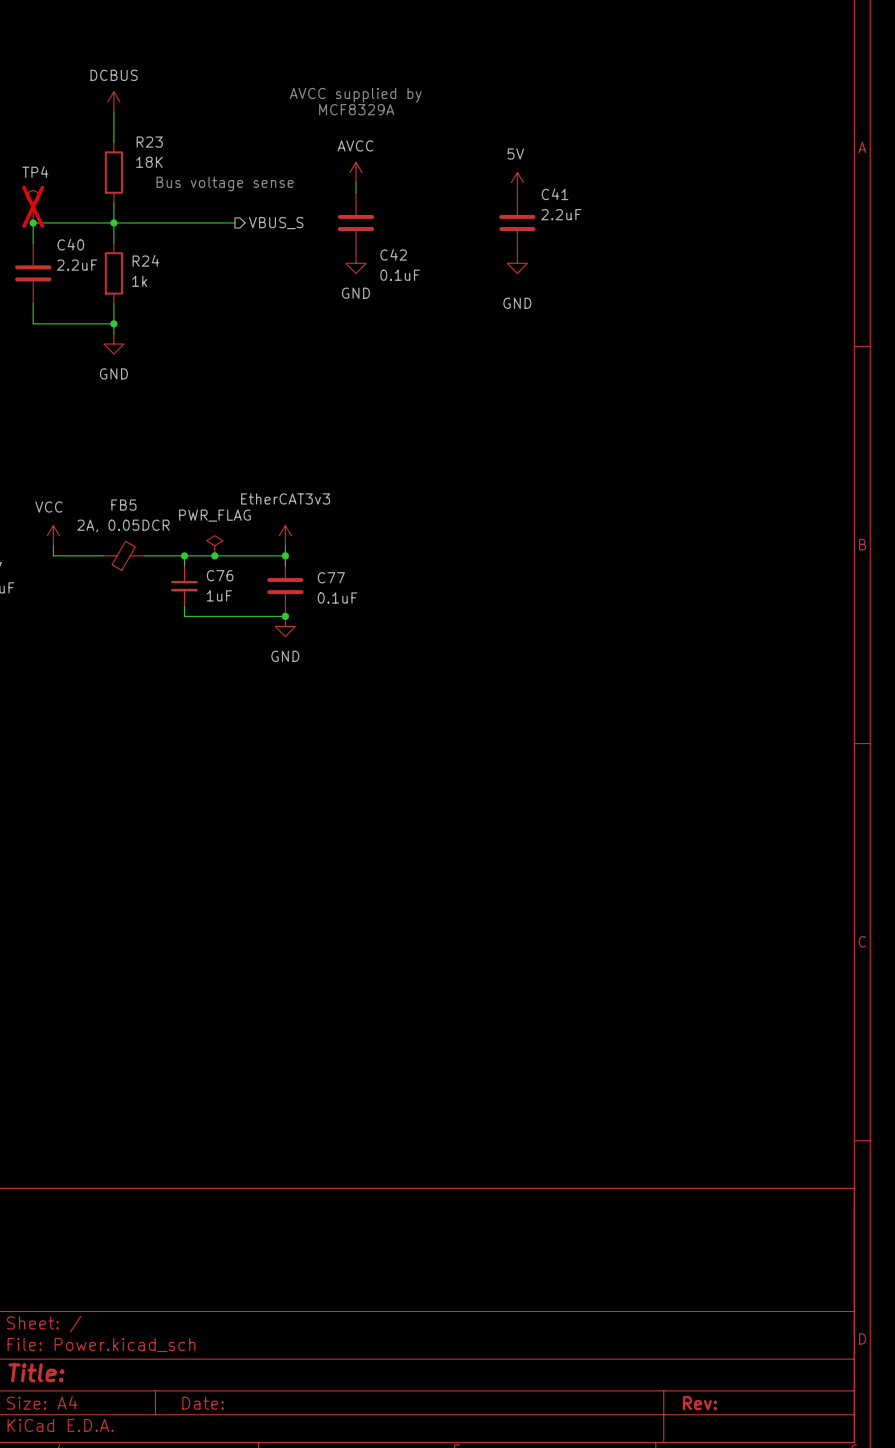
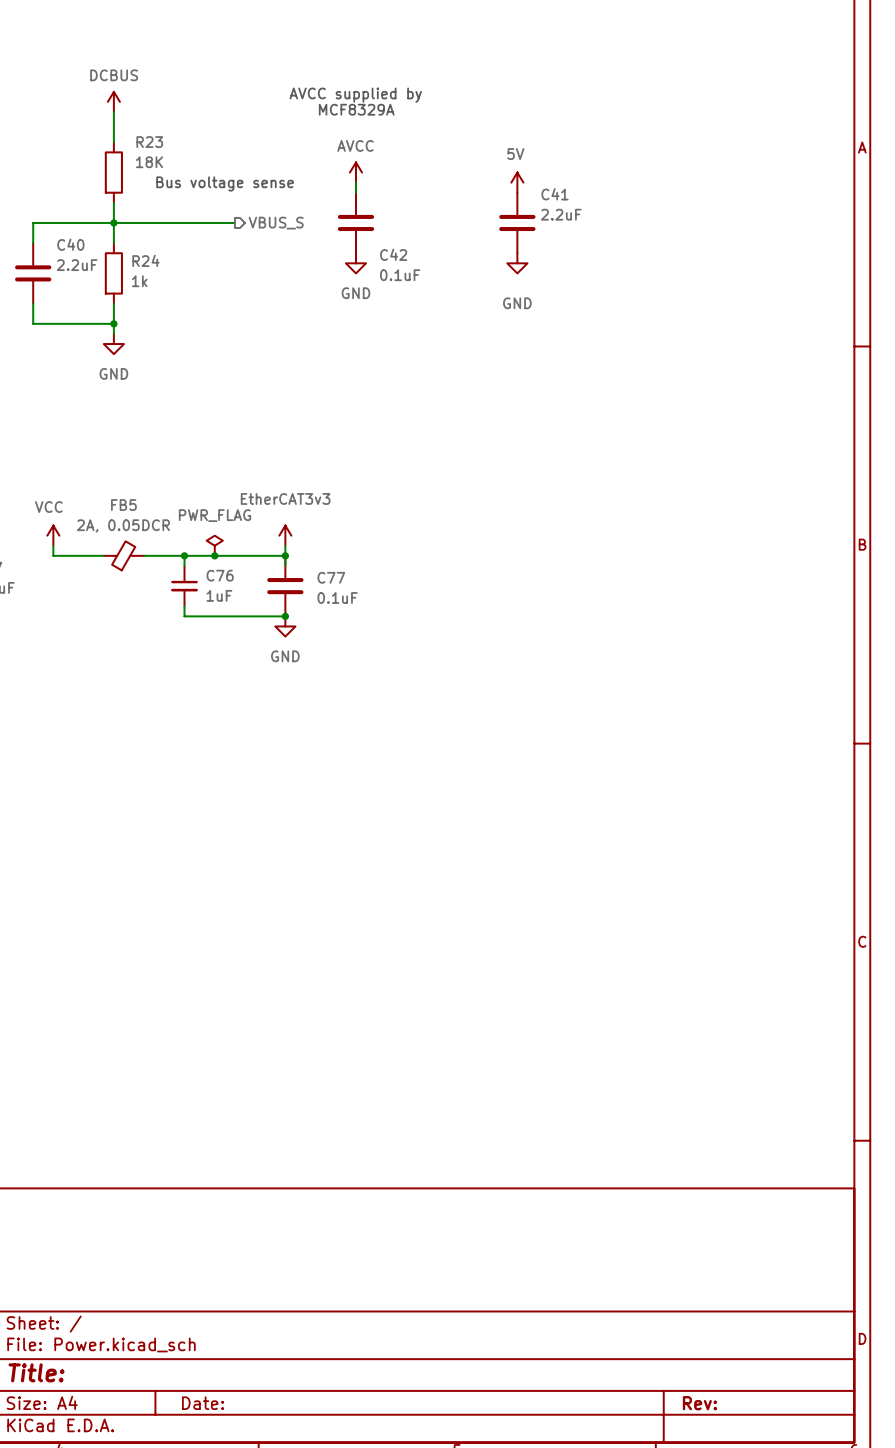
TP4: (33, 206) -> none
junction: (33, 222) -> none

